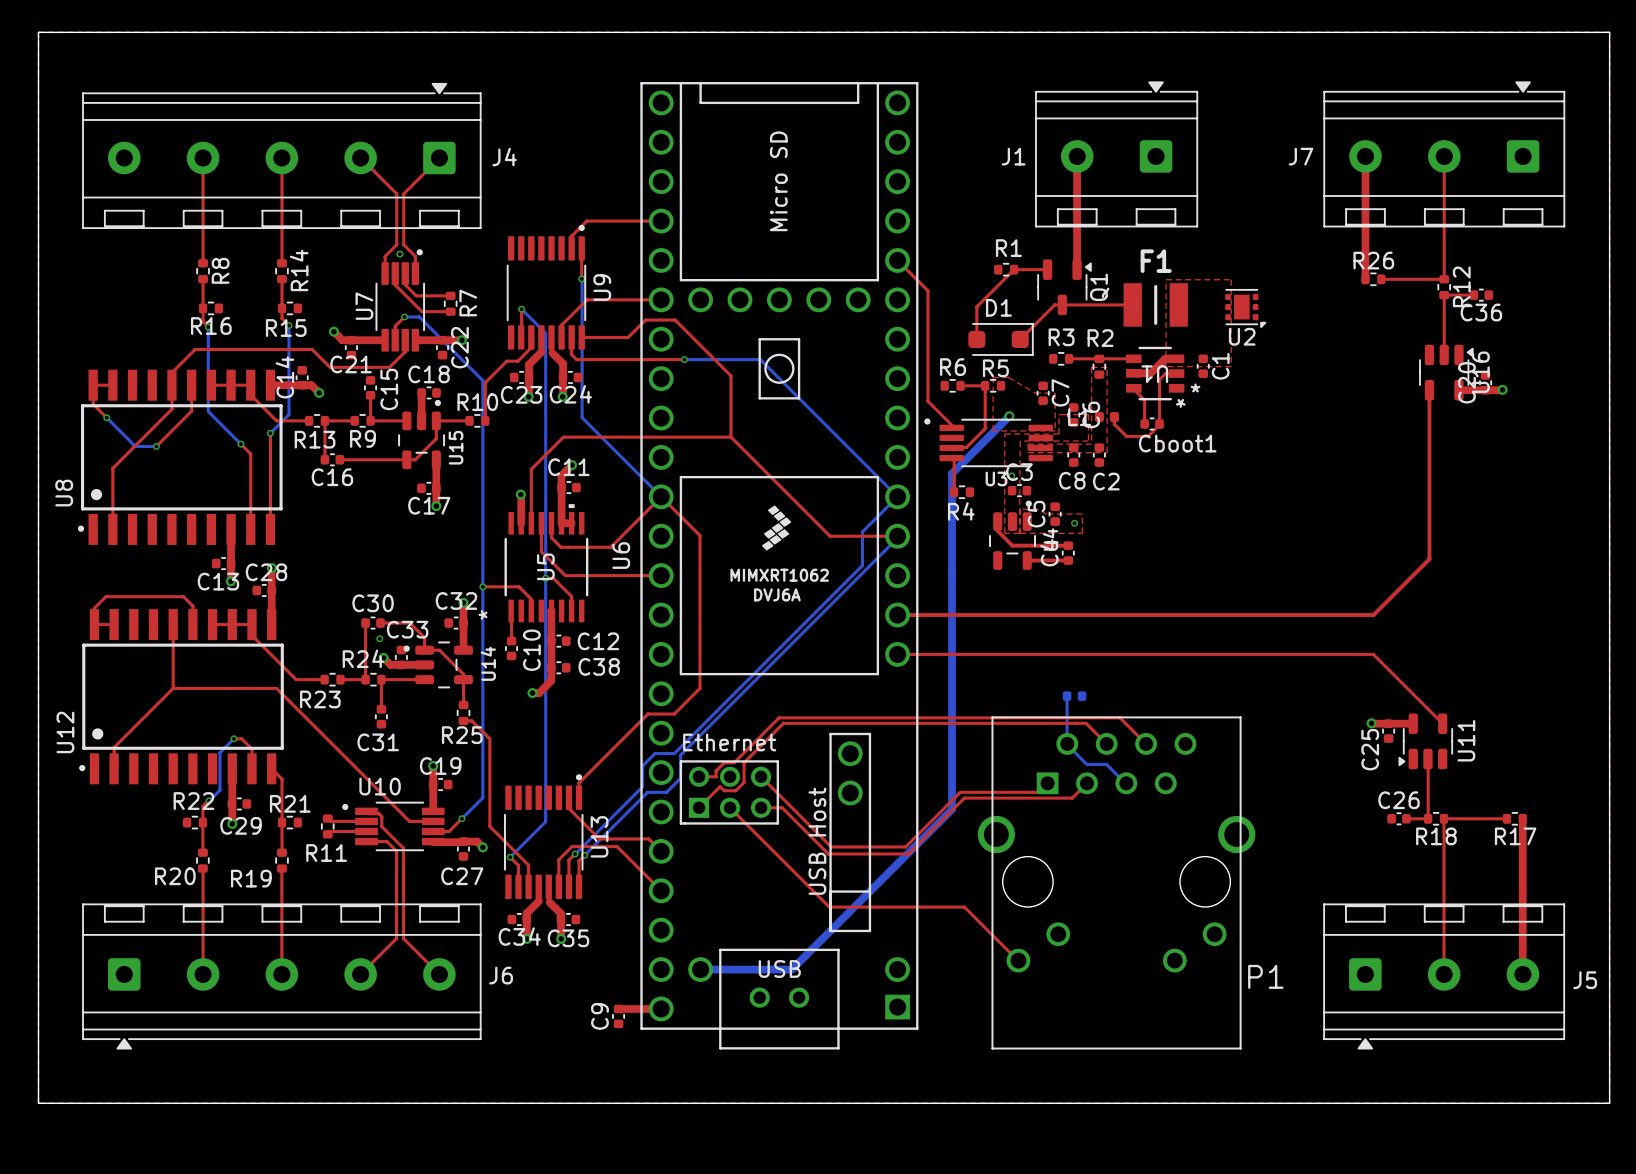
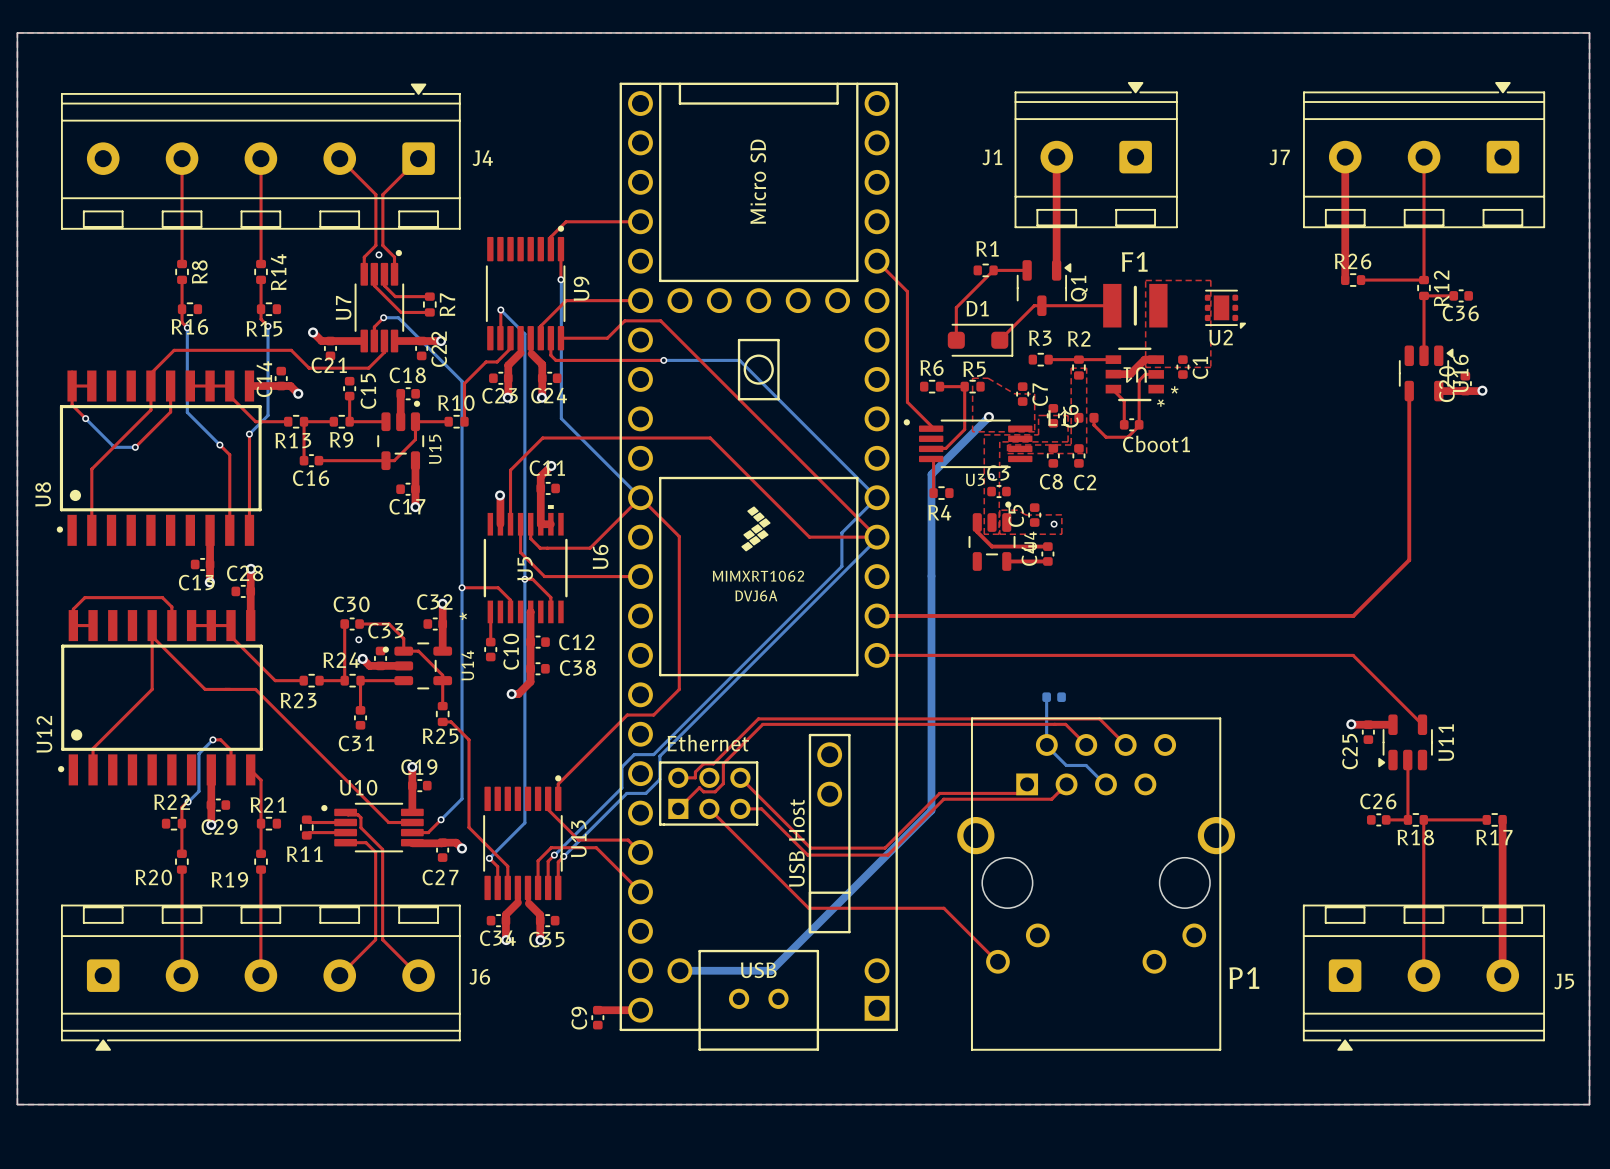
top track: (675, 320) (731, 375) (731, 437) -> (654, 320) (660, 320) (877, 537)
top track: (173, 688) (226, 688) -> (152, 636) (205, 689)

